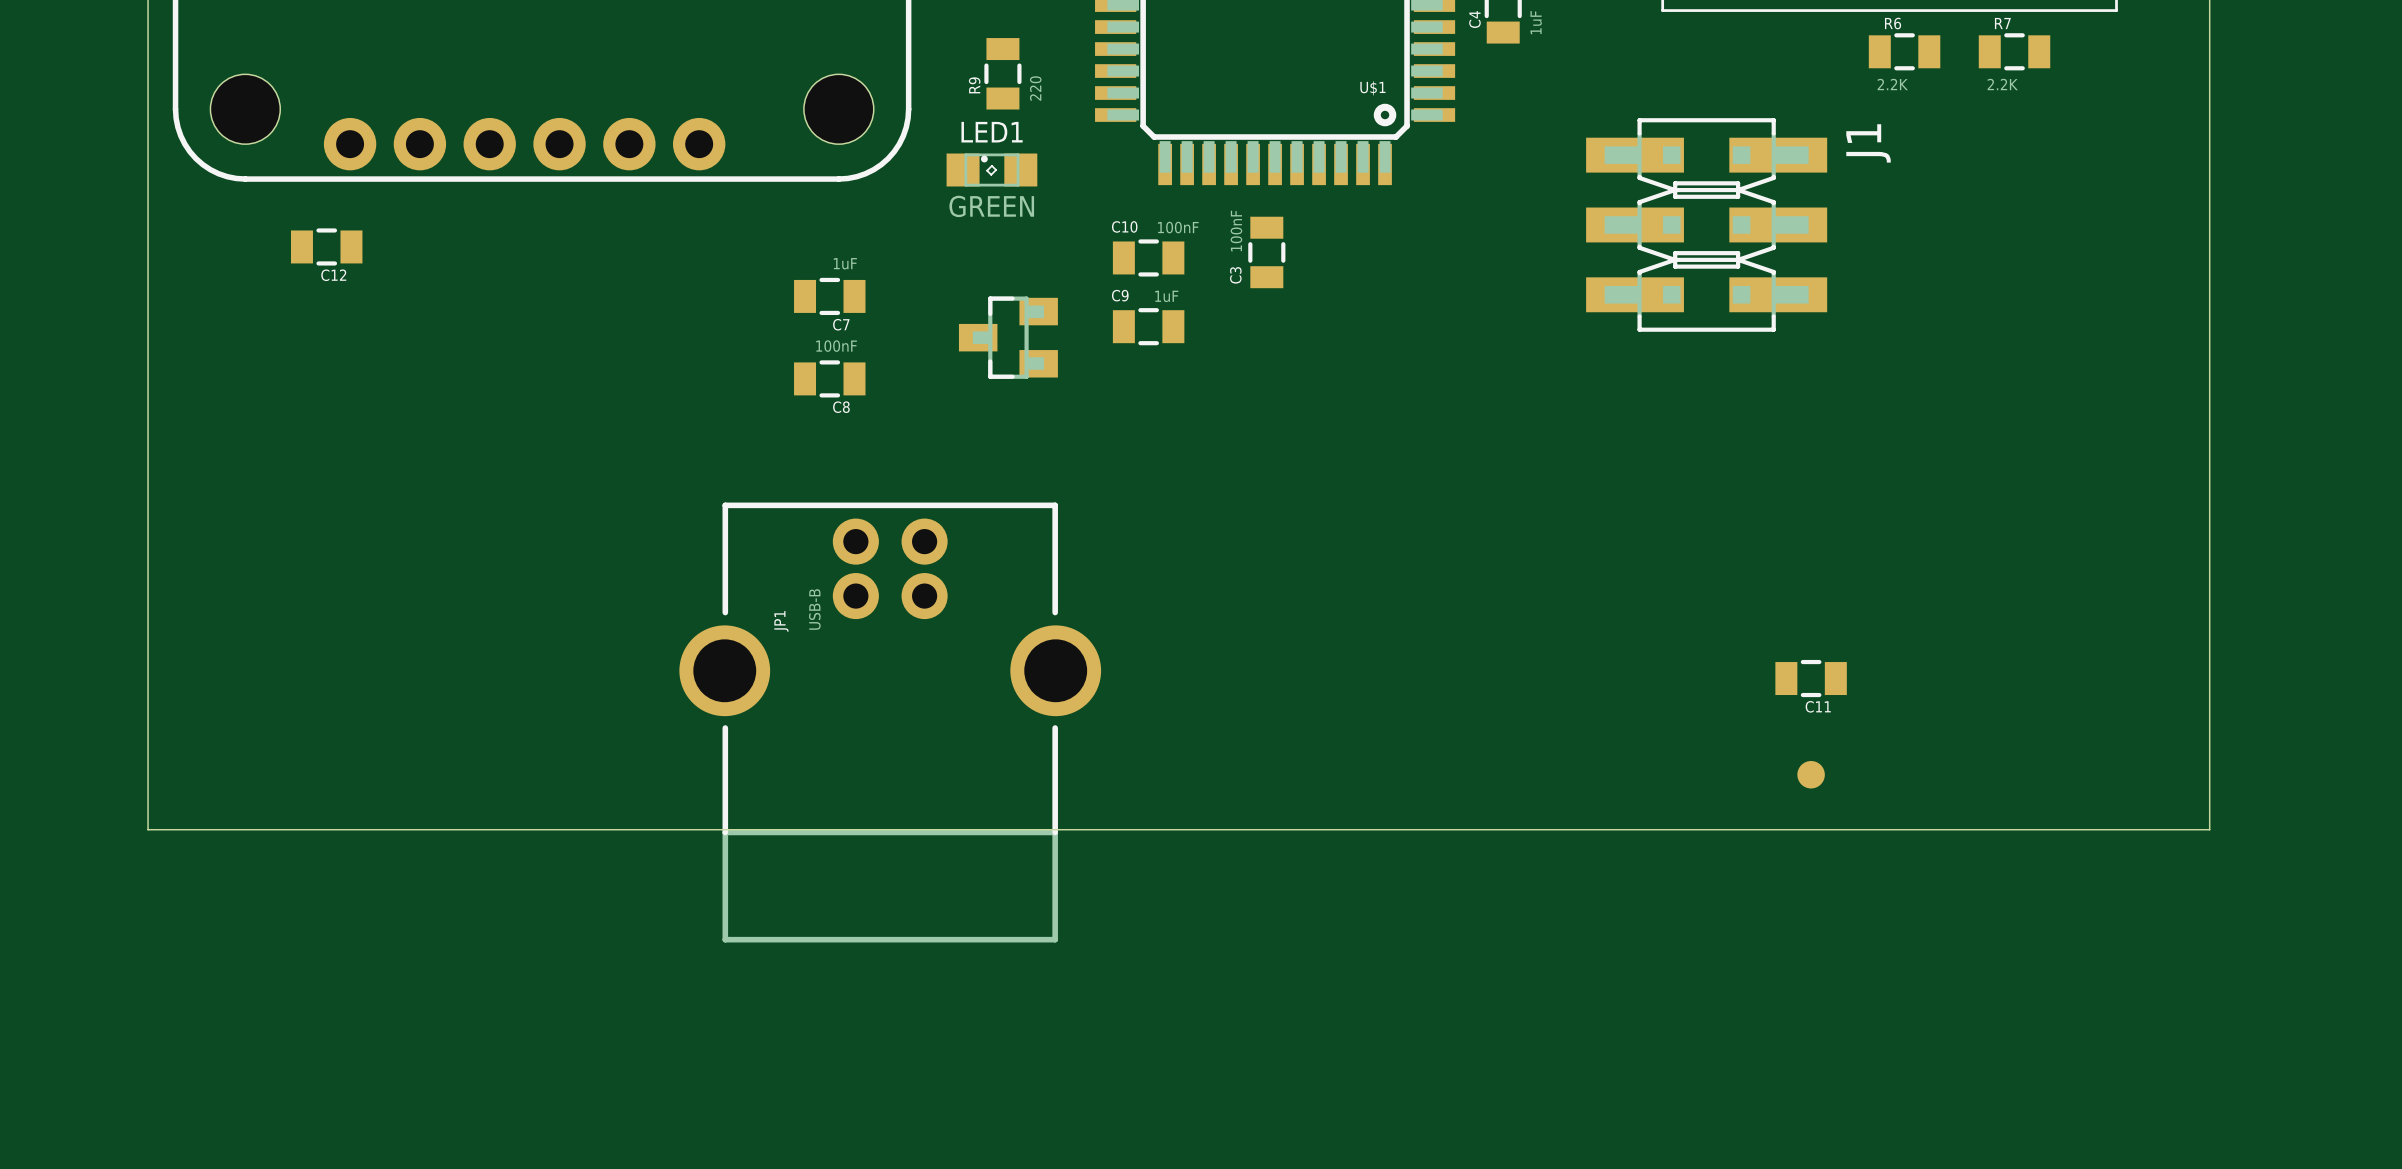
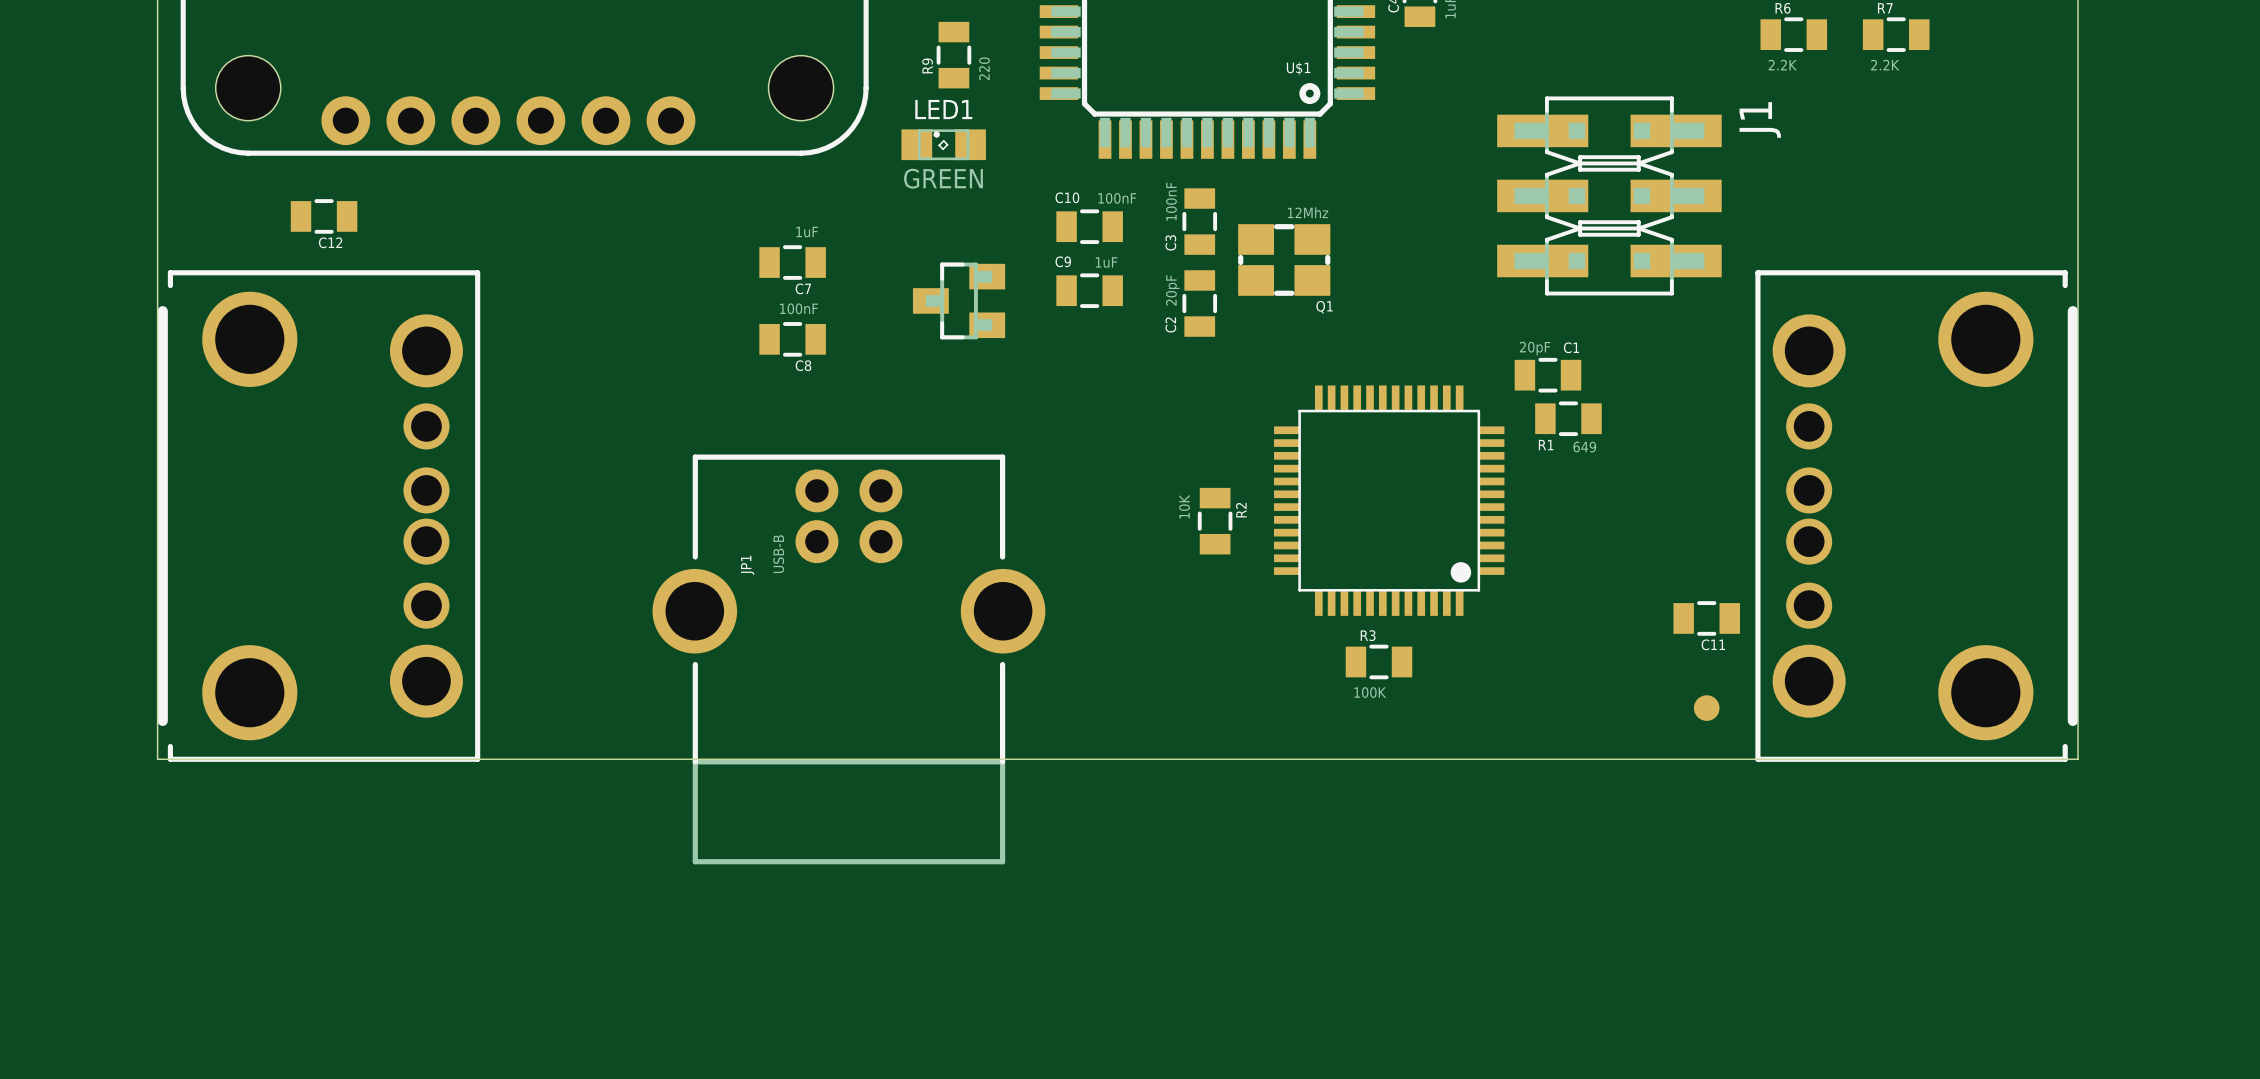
Q1: none -> 12Mhz (1284, 259)
C2: none -> 20pF (1199, 303)
C1: none -> 20pF (1547, 375)
R1: none -> 649 (1568, 418)
part: none -> (1389, 500)
part: none -> (318, 516)
part: none -> (1916, 516)
R2: none -> 10K (1215, 521)
R3: none -> 100K (1378, 661)

